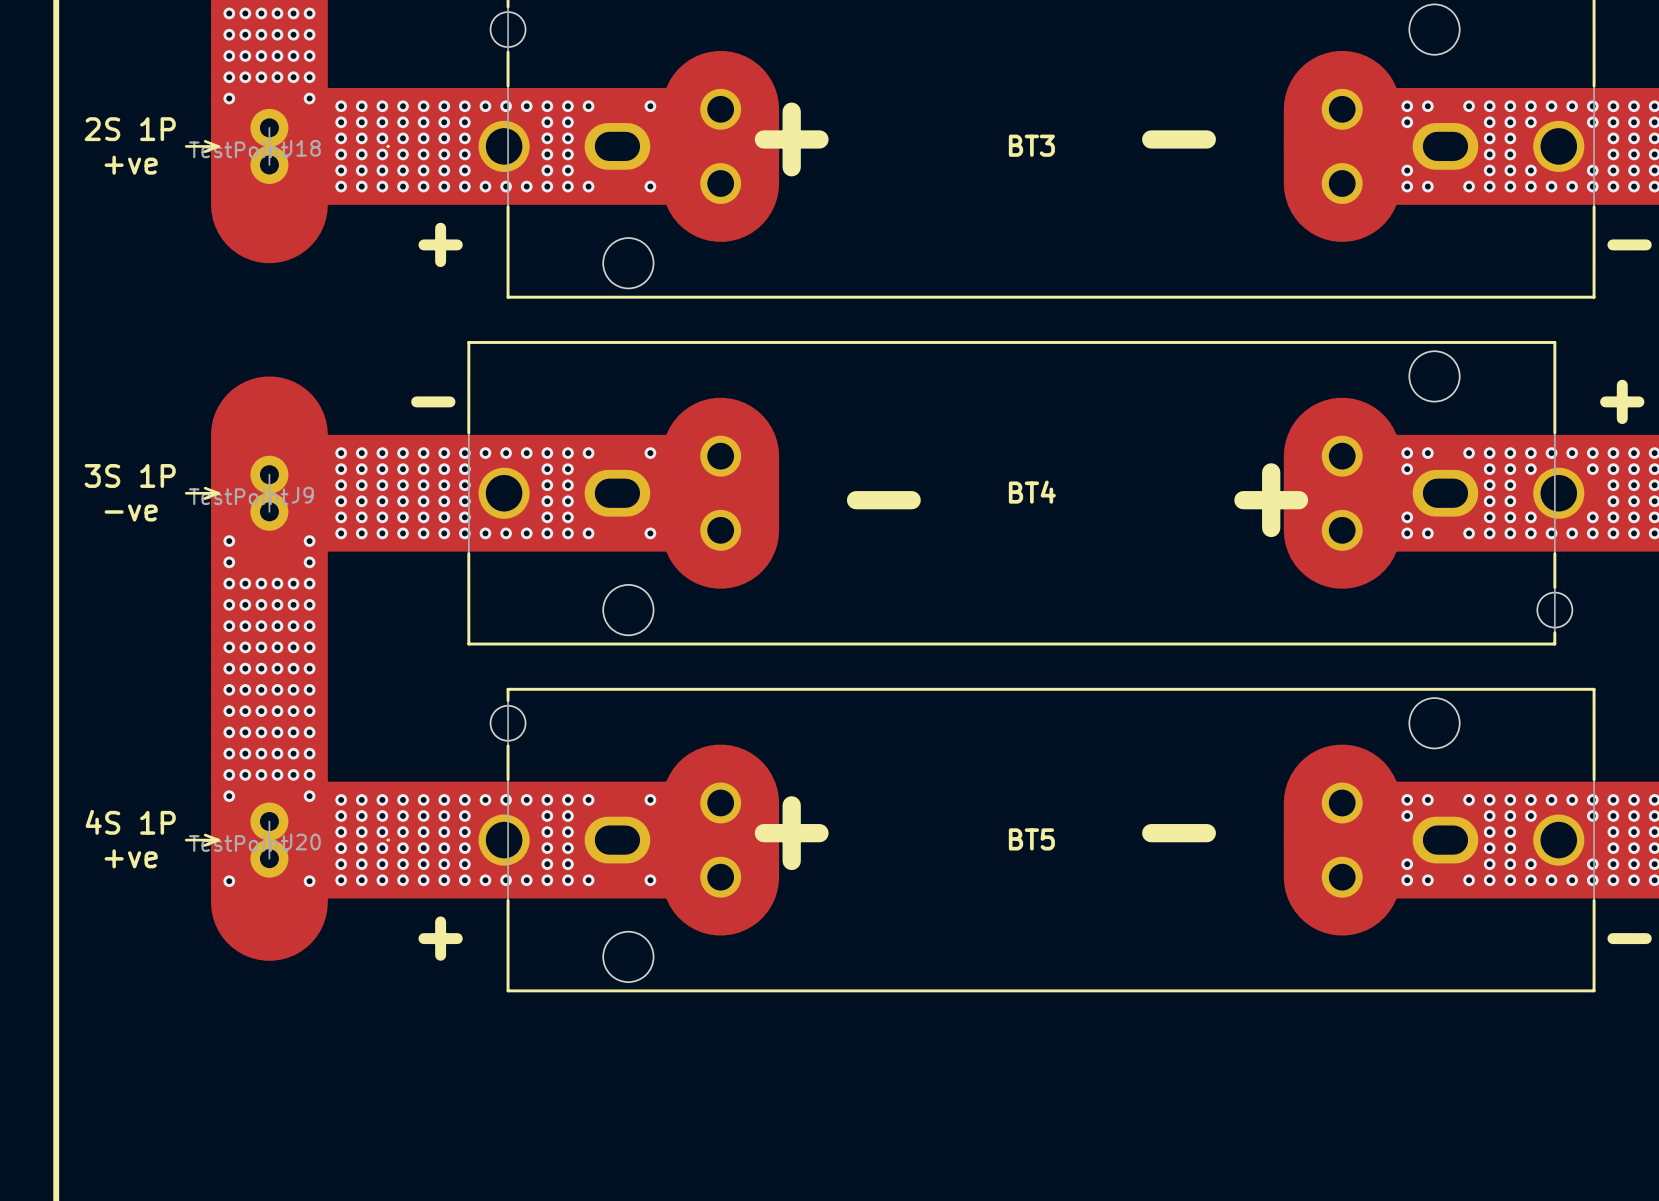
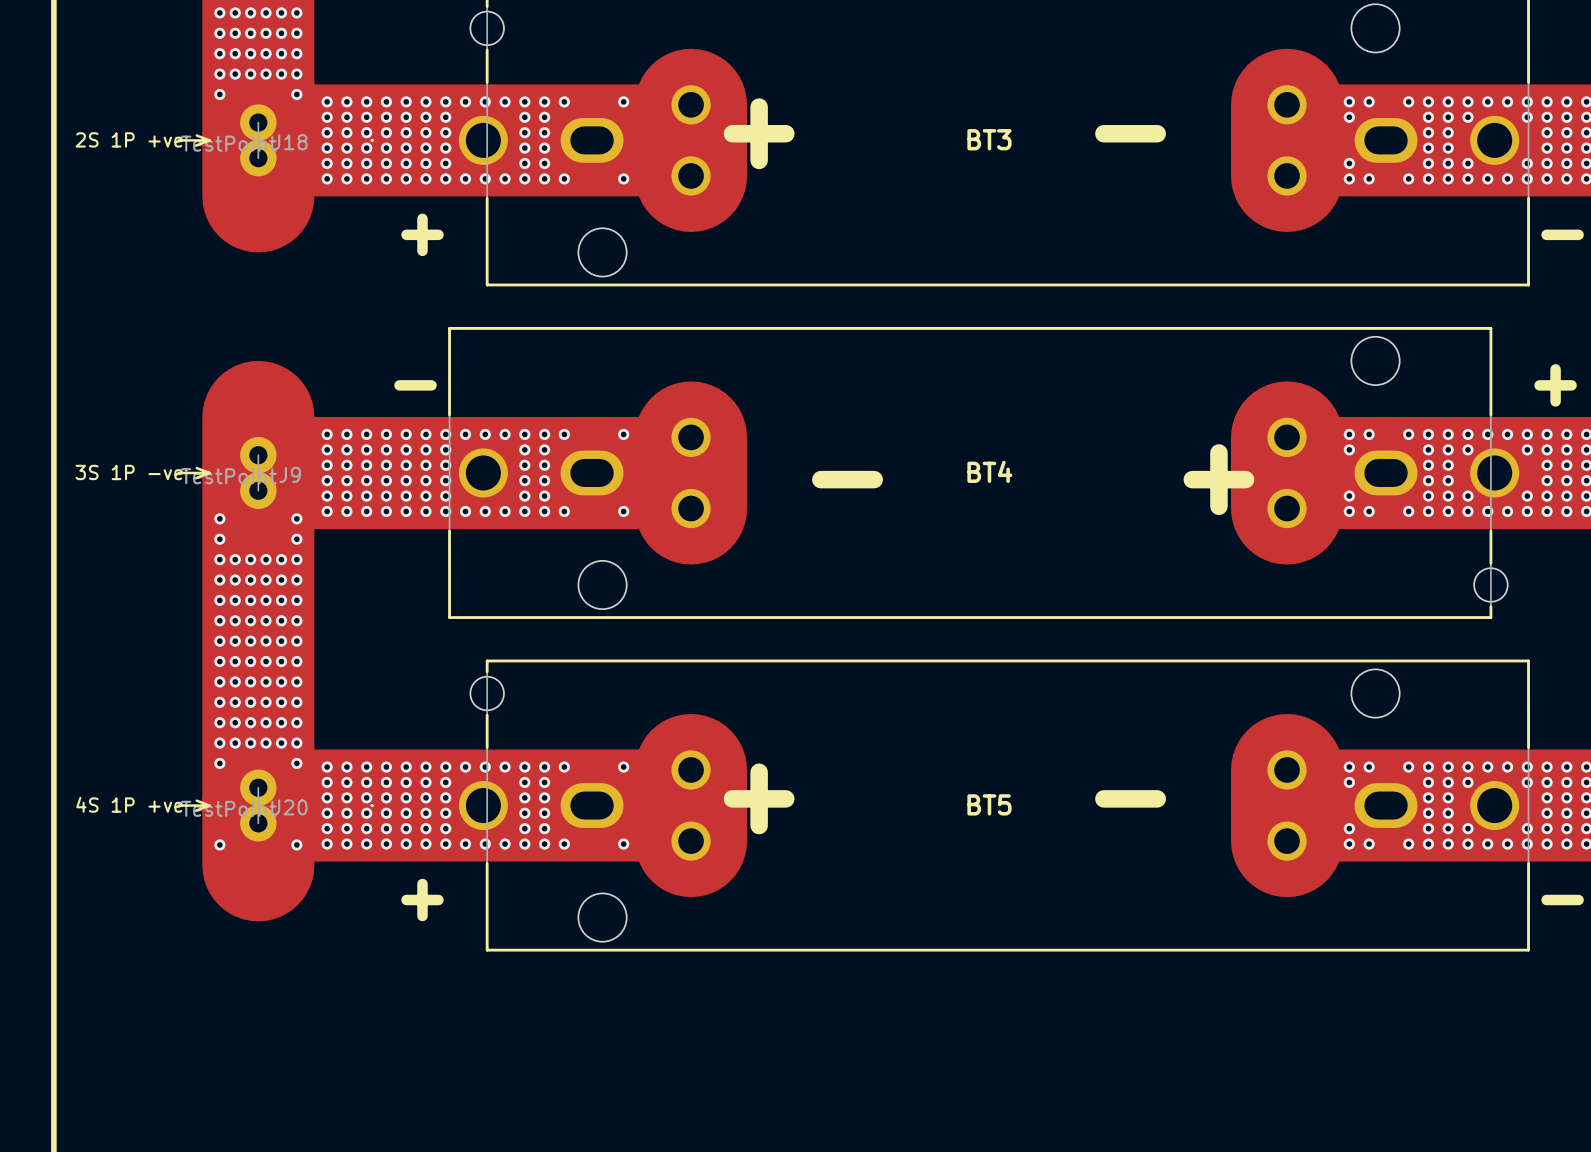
text: 2S 1P (130, 129) -> 2S 1P +ve (129, 139)
text: +ve (131, 165) -> none
text: 3S 1P (130, 475) -> 3S 1P -ve (129, 472)
text: -ve (131, 512) -> none
text: 4S 1P (130, 822) -> 4S 1P +ve (129, 804)
text: +ve (131, 858) -> none

